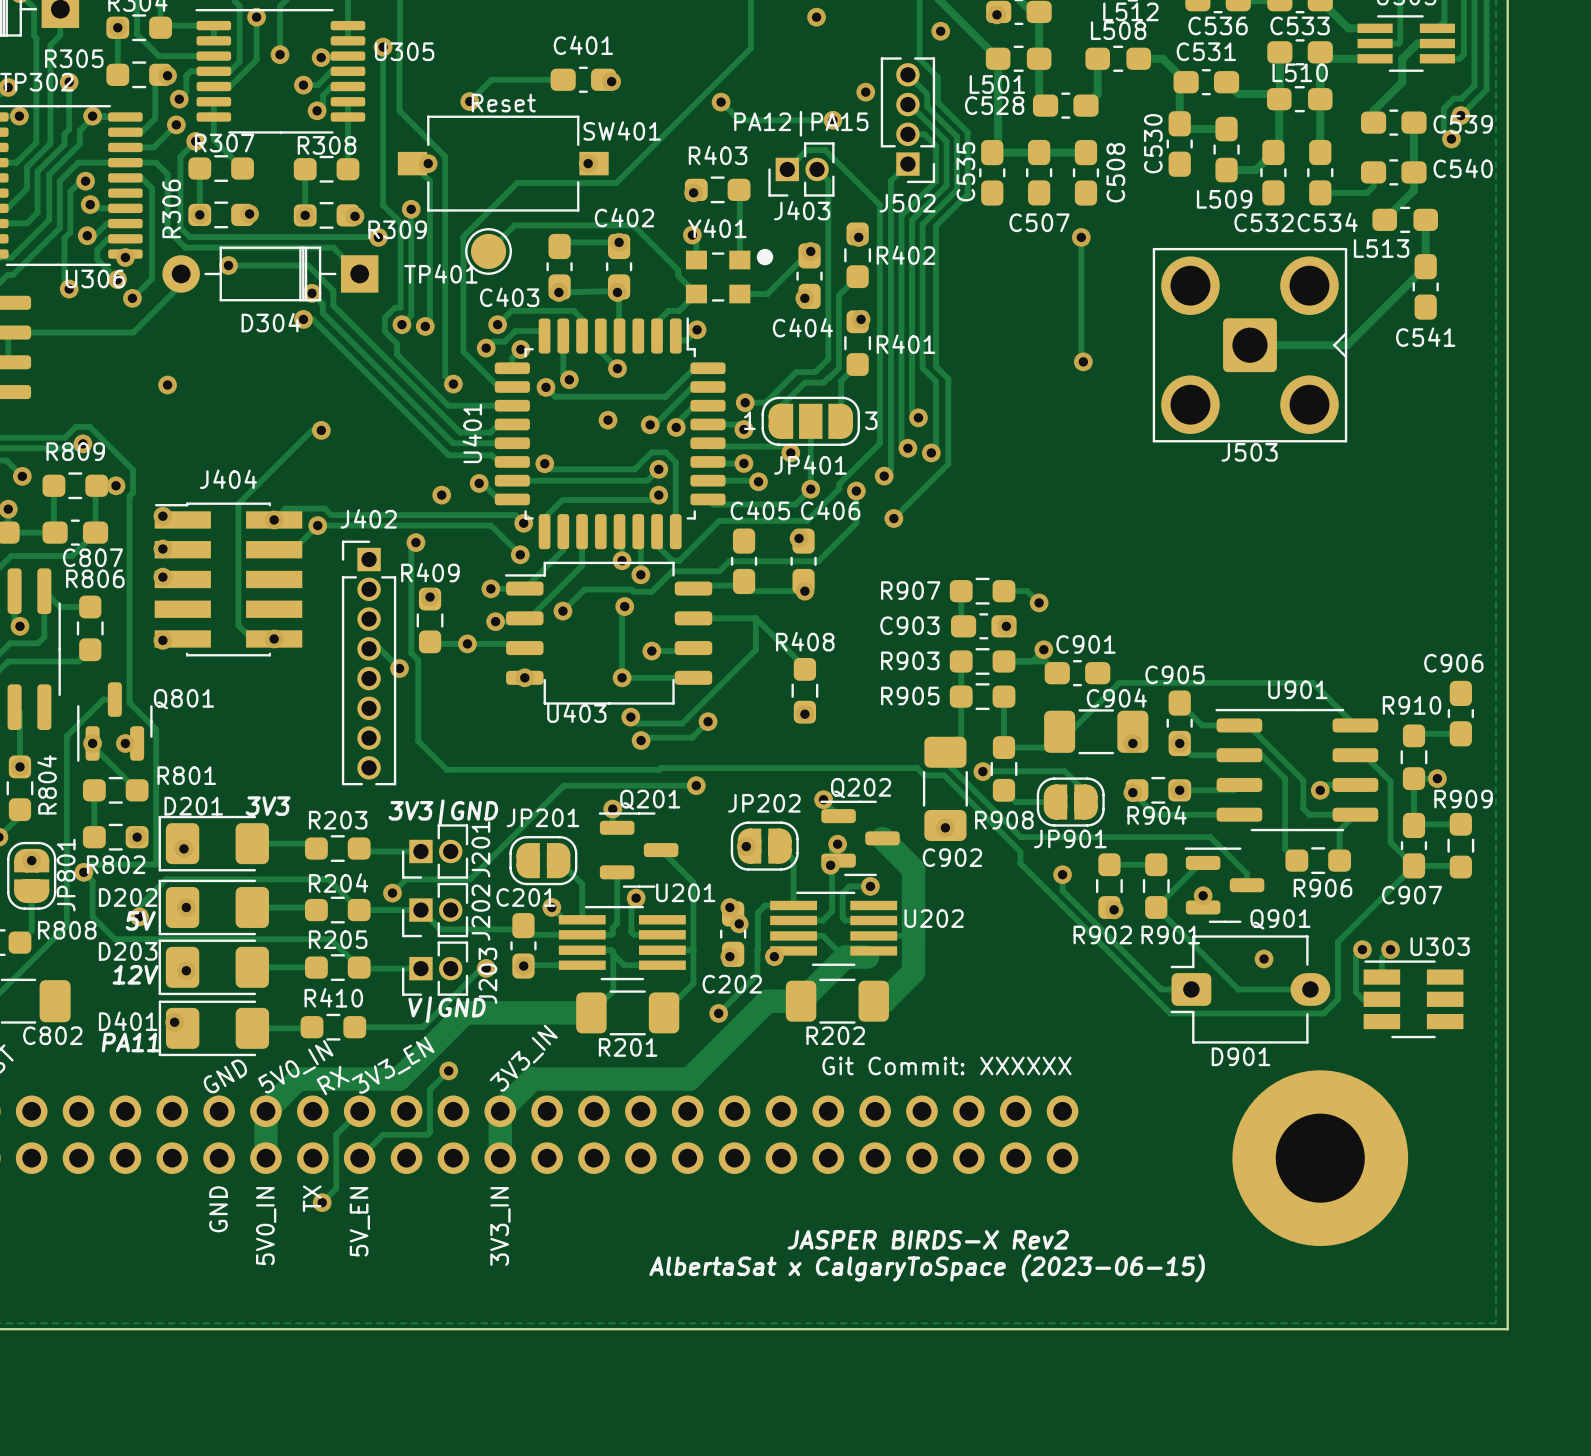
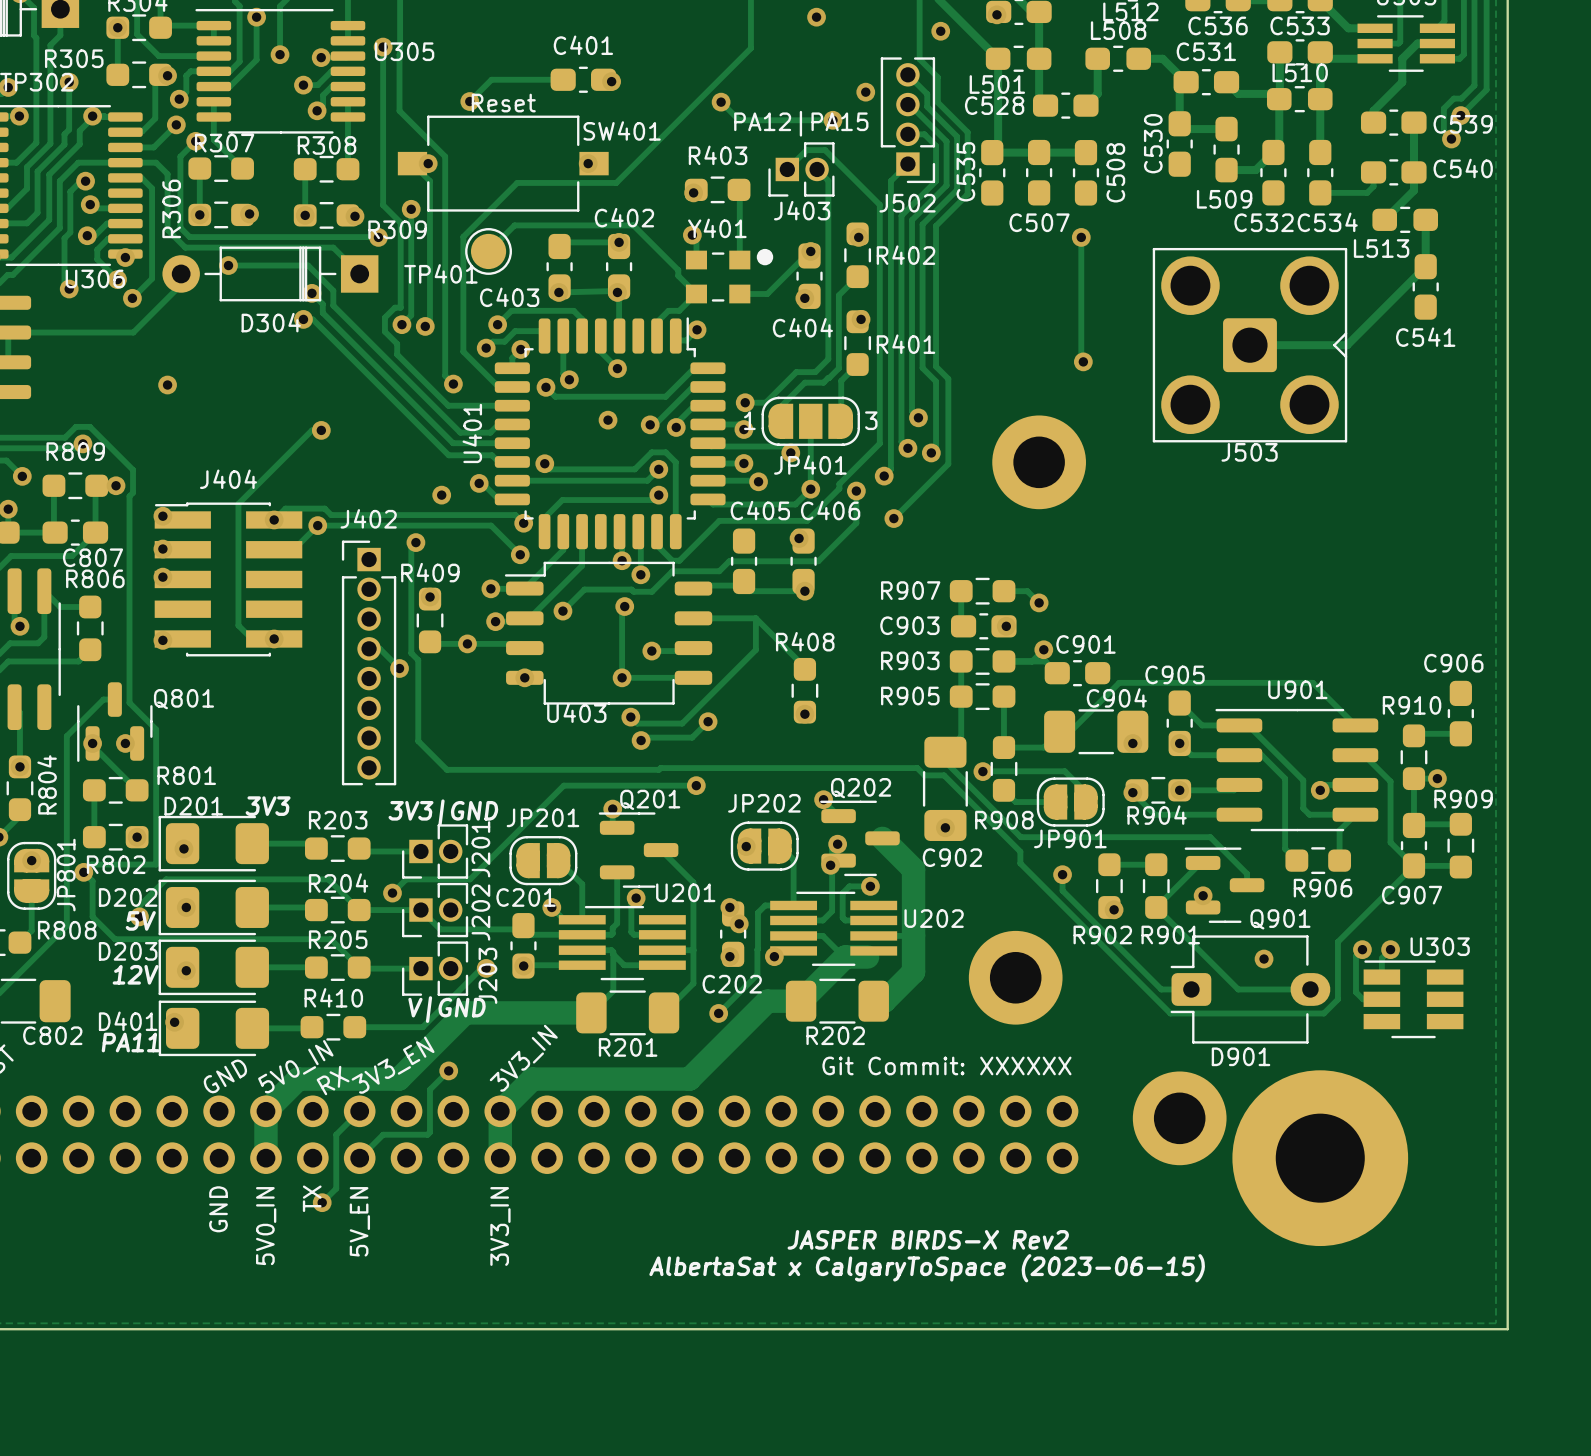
part: none -> (1039, 462)
part: none -> (1015, 977)
part: none -> (1179, 1118)

